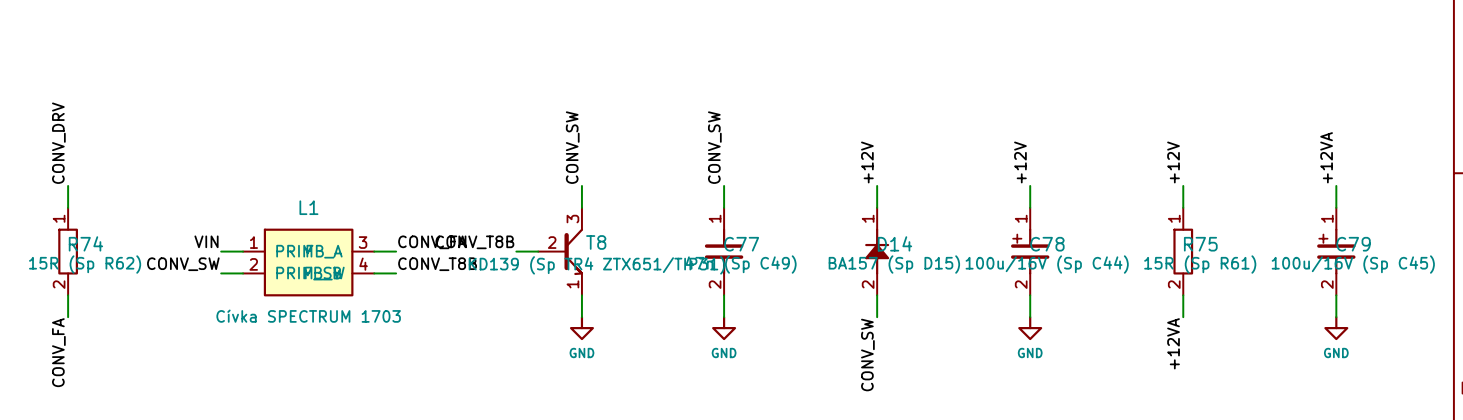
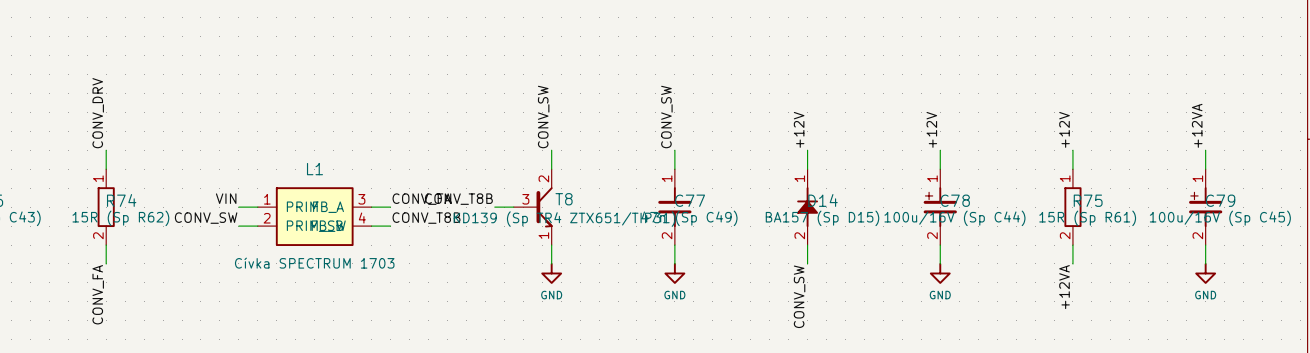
T8 pin number: 3 (572, 219) -> 2 (543, 178)
T8 pin number: 2 (552, 242) -> 3 (525, 199)

